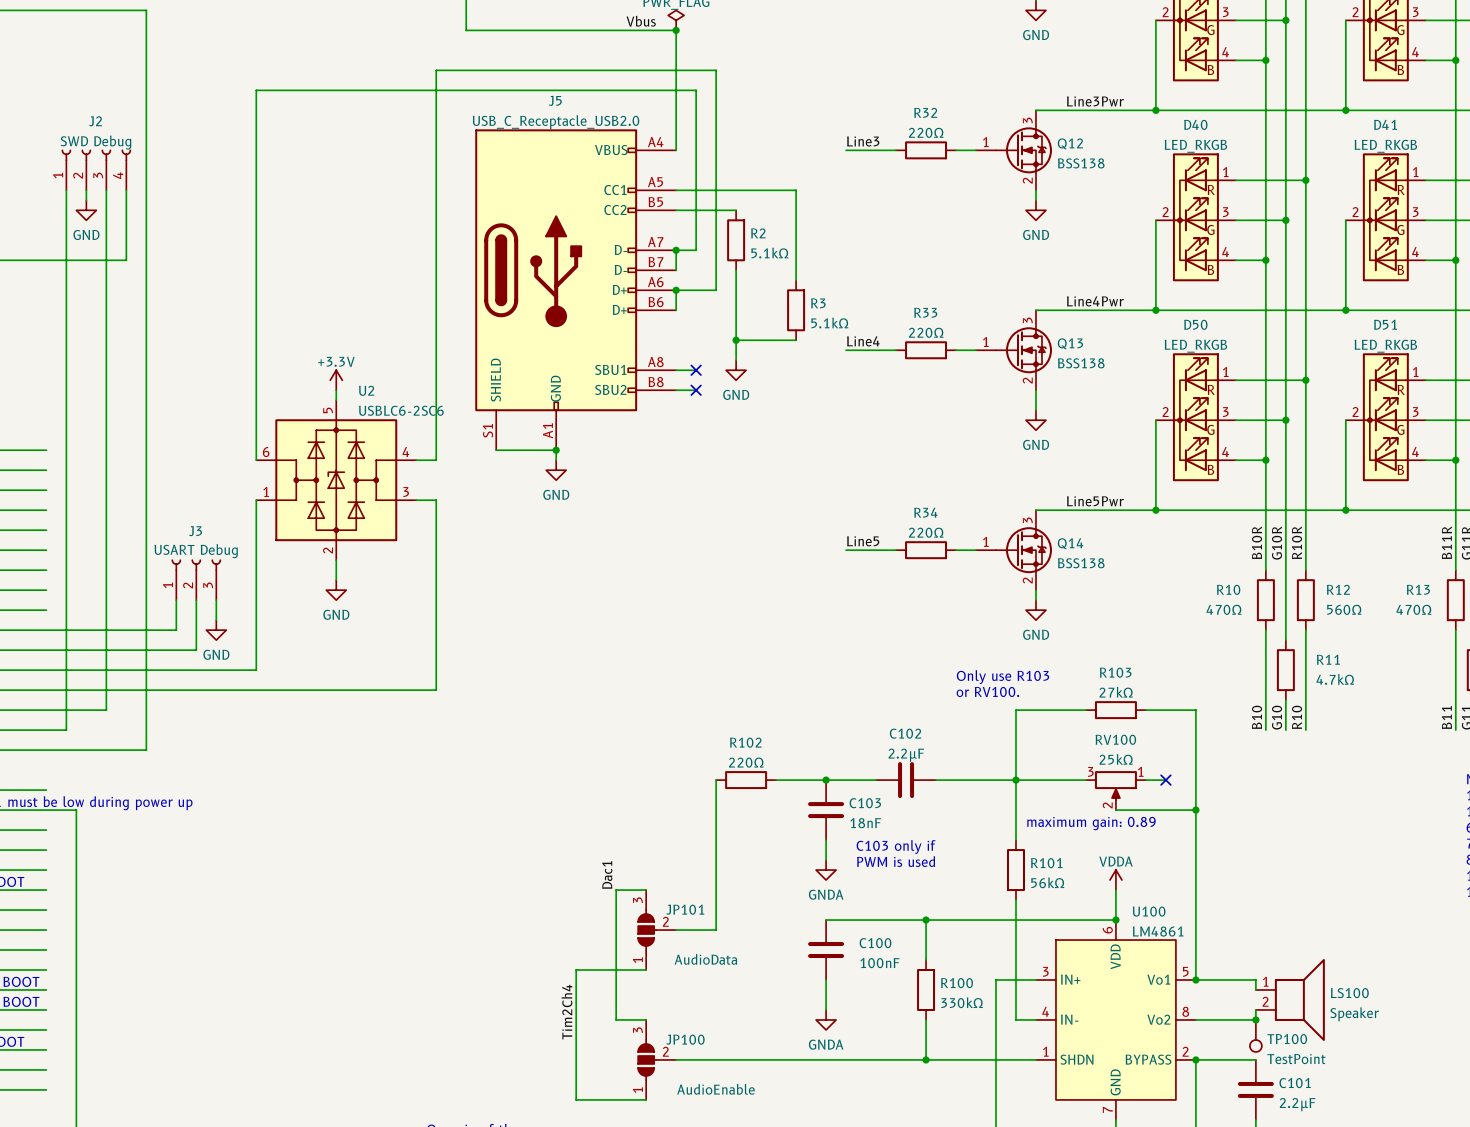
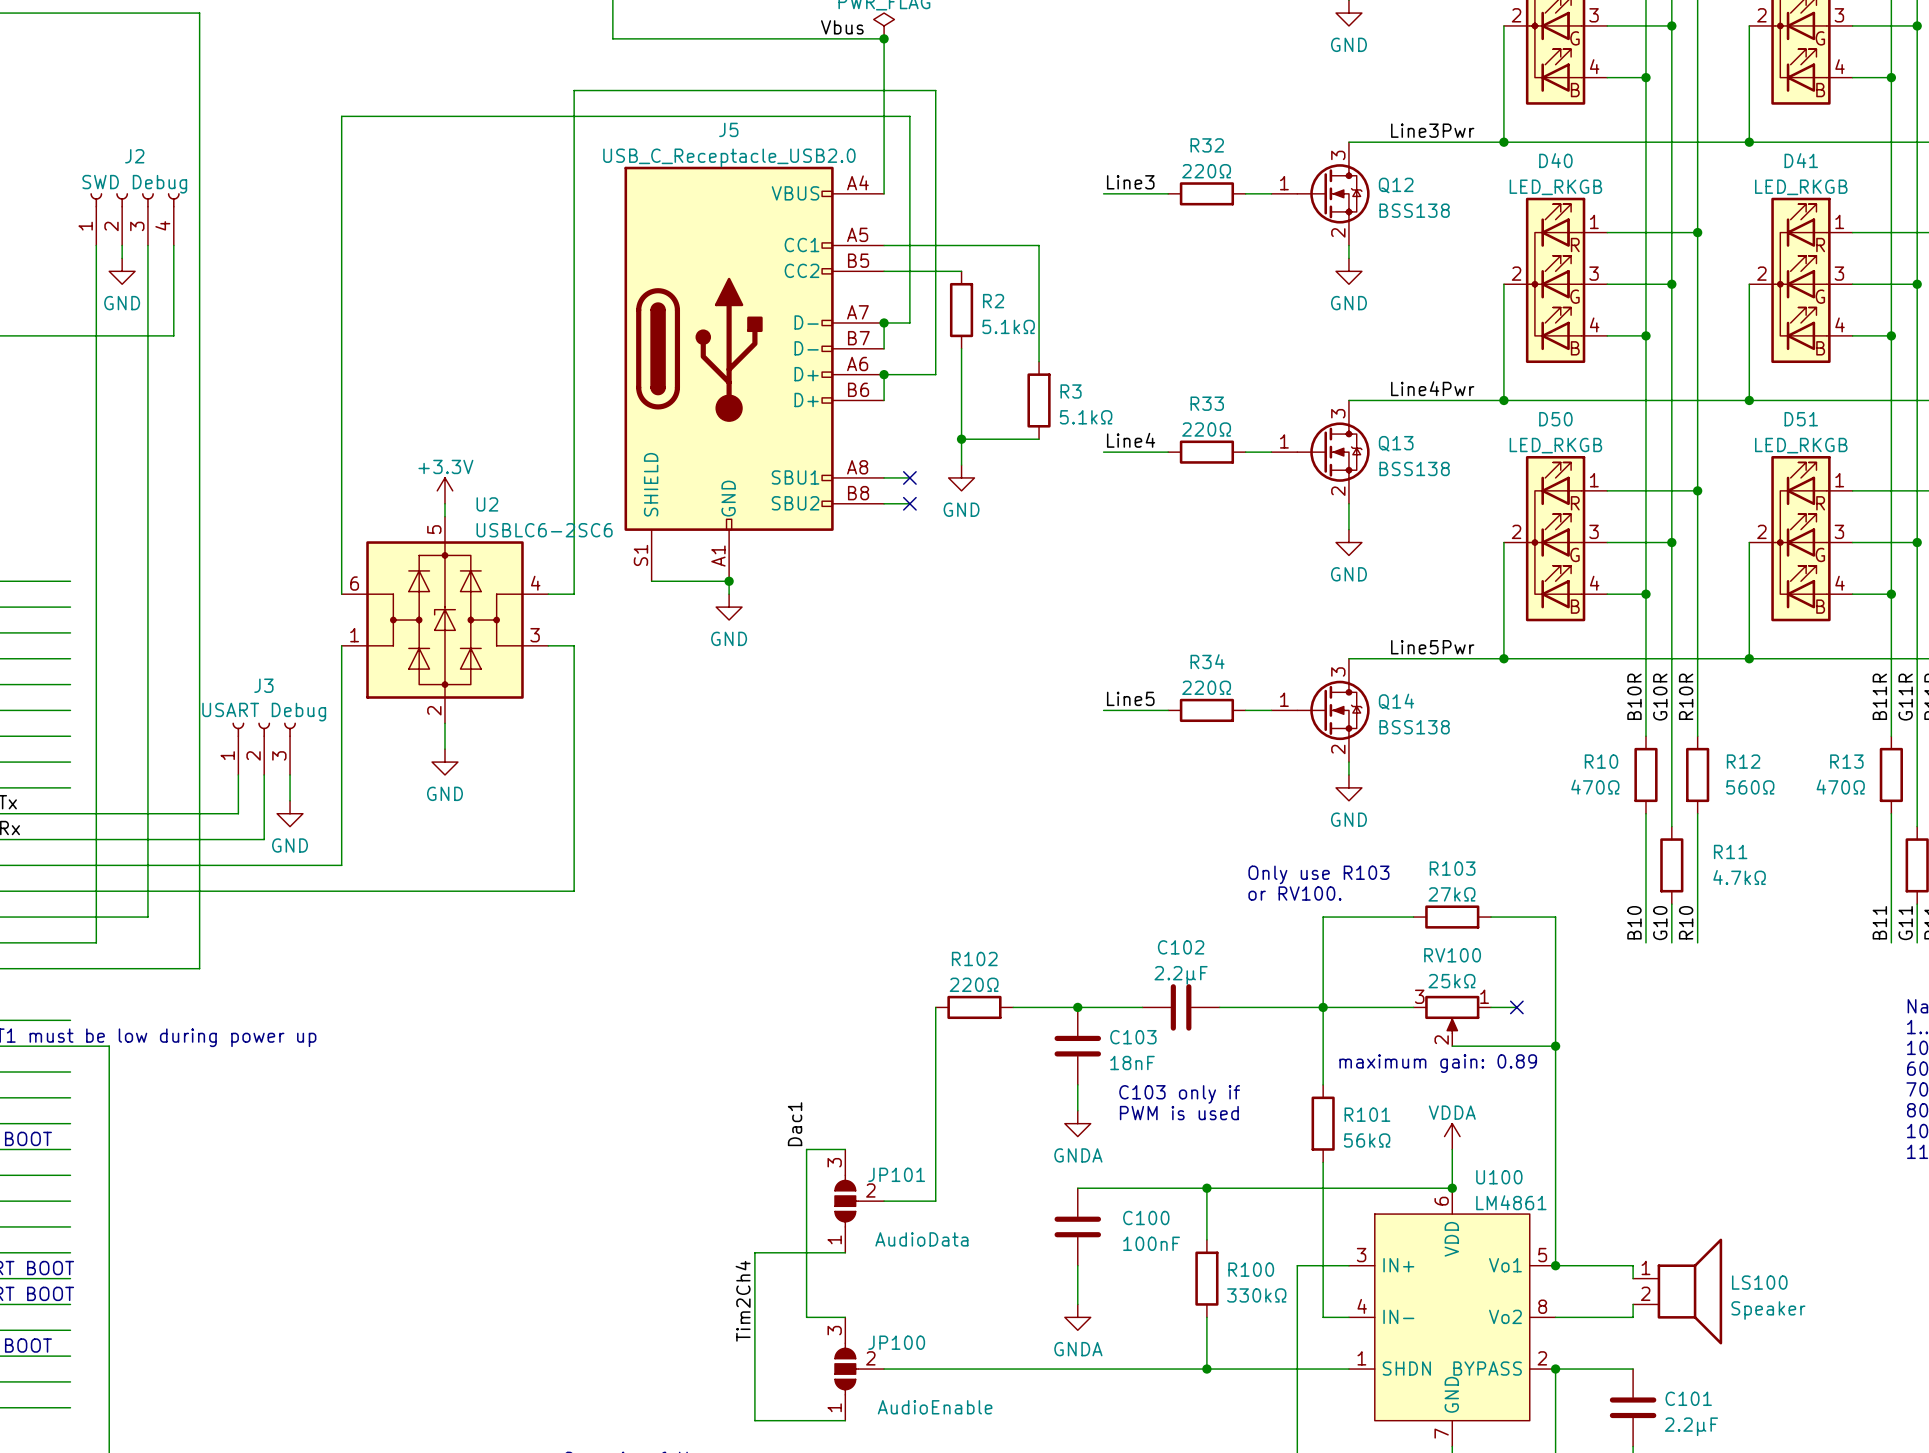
junction: (1255, 1019) -> none
TP100: TestPoint (1255, 1035) -> none

